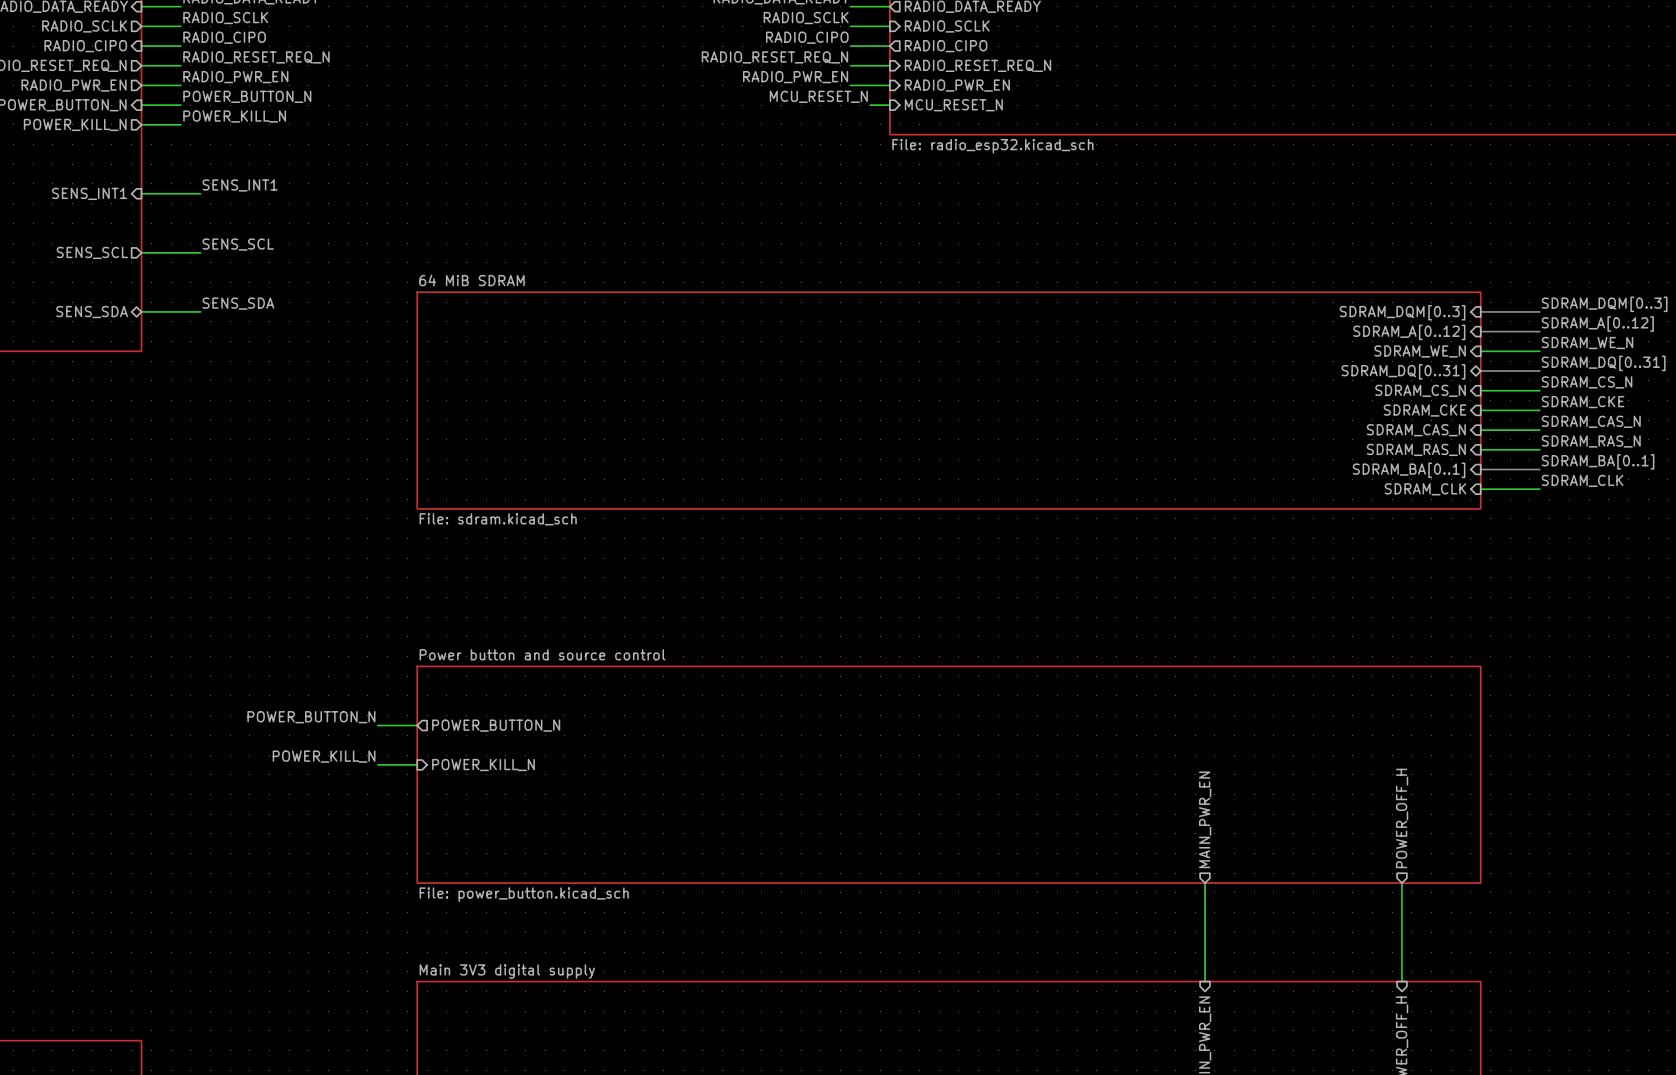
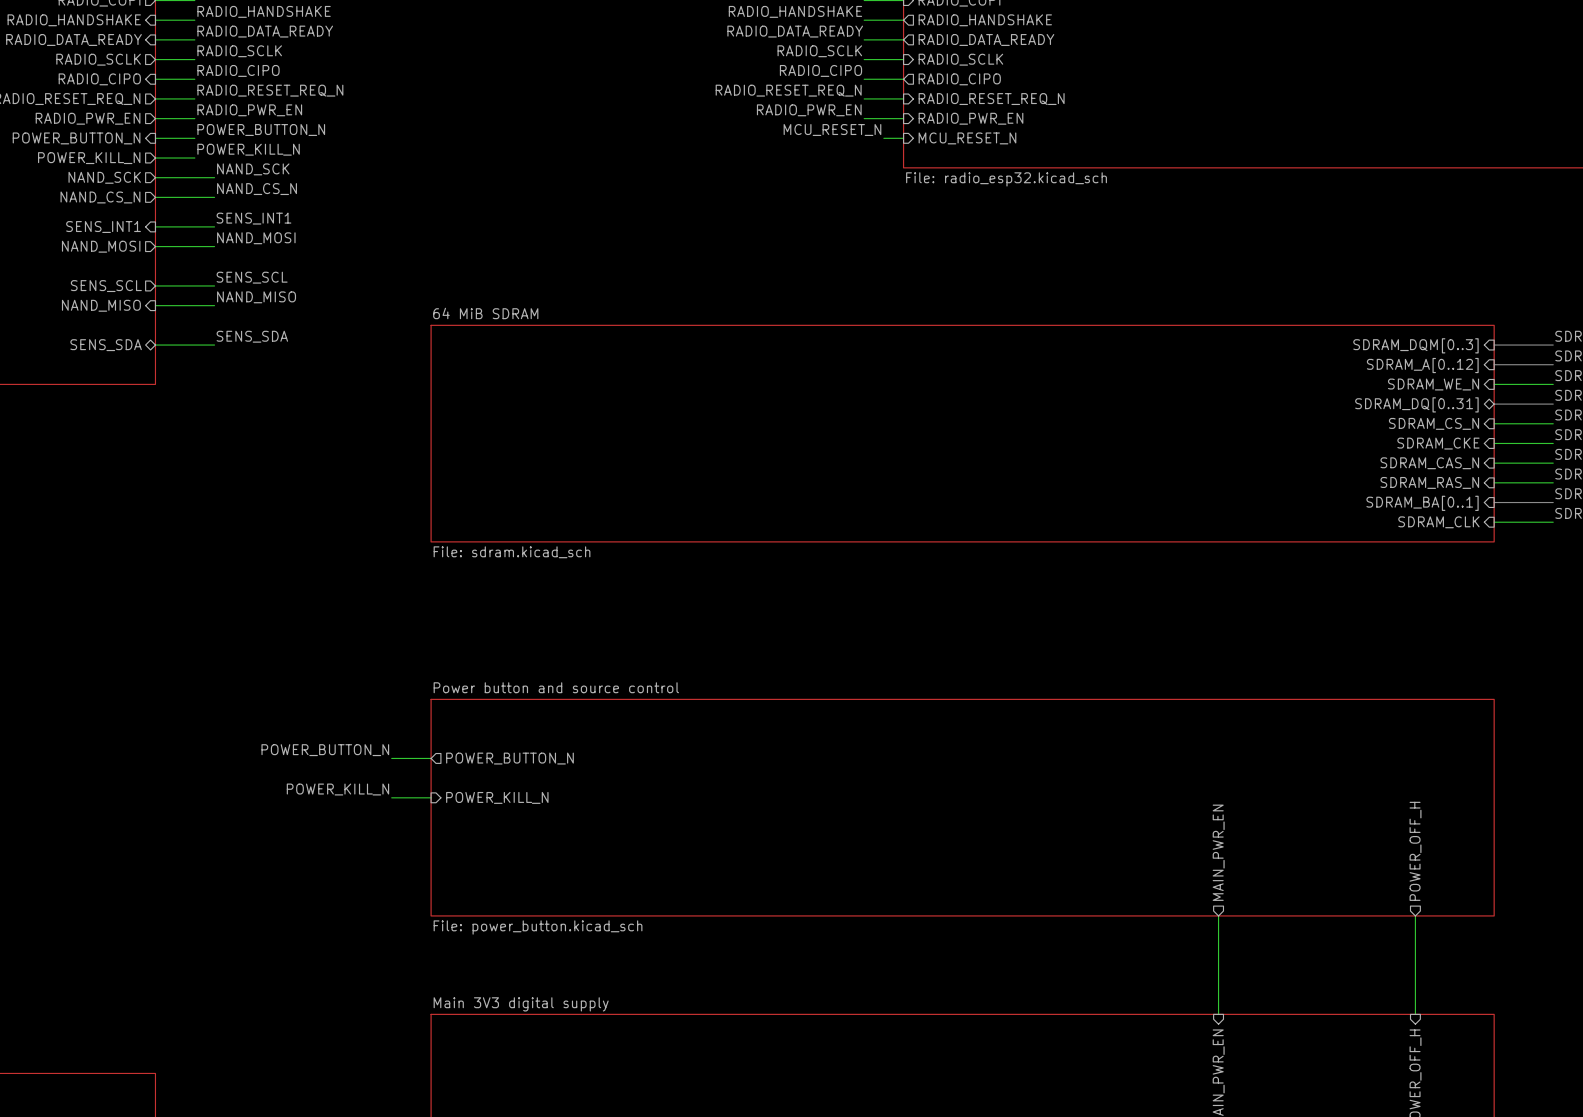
label: none -> NAND_SCK (253, 169)
sheet pin: none -> NAND_SCK (104, 177)
wire: none -> (155, 177) (214, 177)
label: none -> NAND_CS_N (257, 189)
sheet pin: none -> NAND_CS_N (100, 197)
wire: none -> (155, 197) (214, 197)
label: none -> NAND_MOSI (256, 238)
sheet pin: none -> NAND_MOSI (101, 246)
wire: none -> (155, 246) (214, 246)
label: none -> NAND_MISO (256, 297)
sheet pin: none -> NAND_MISO (101, 305)
wire: none -> (155, 305) (214, 305)

